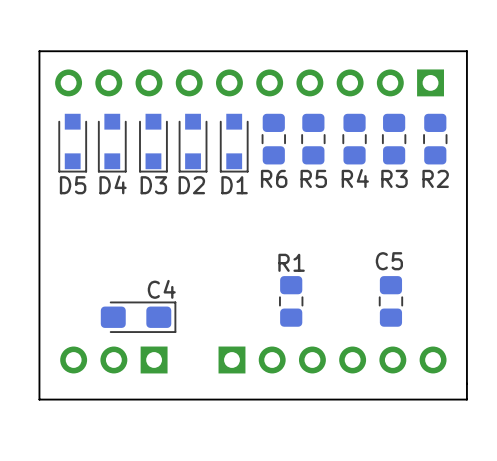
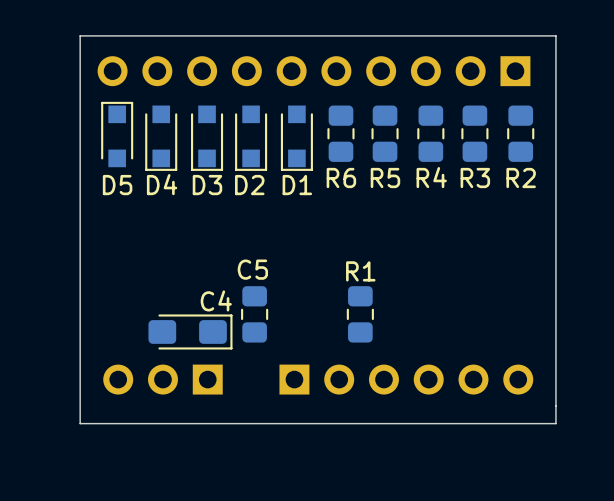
D5 rotation: 0° (72, 143) -> 180° (117, 134)
C5 position: (390, 301) -> (254, 314)

